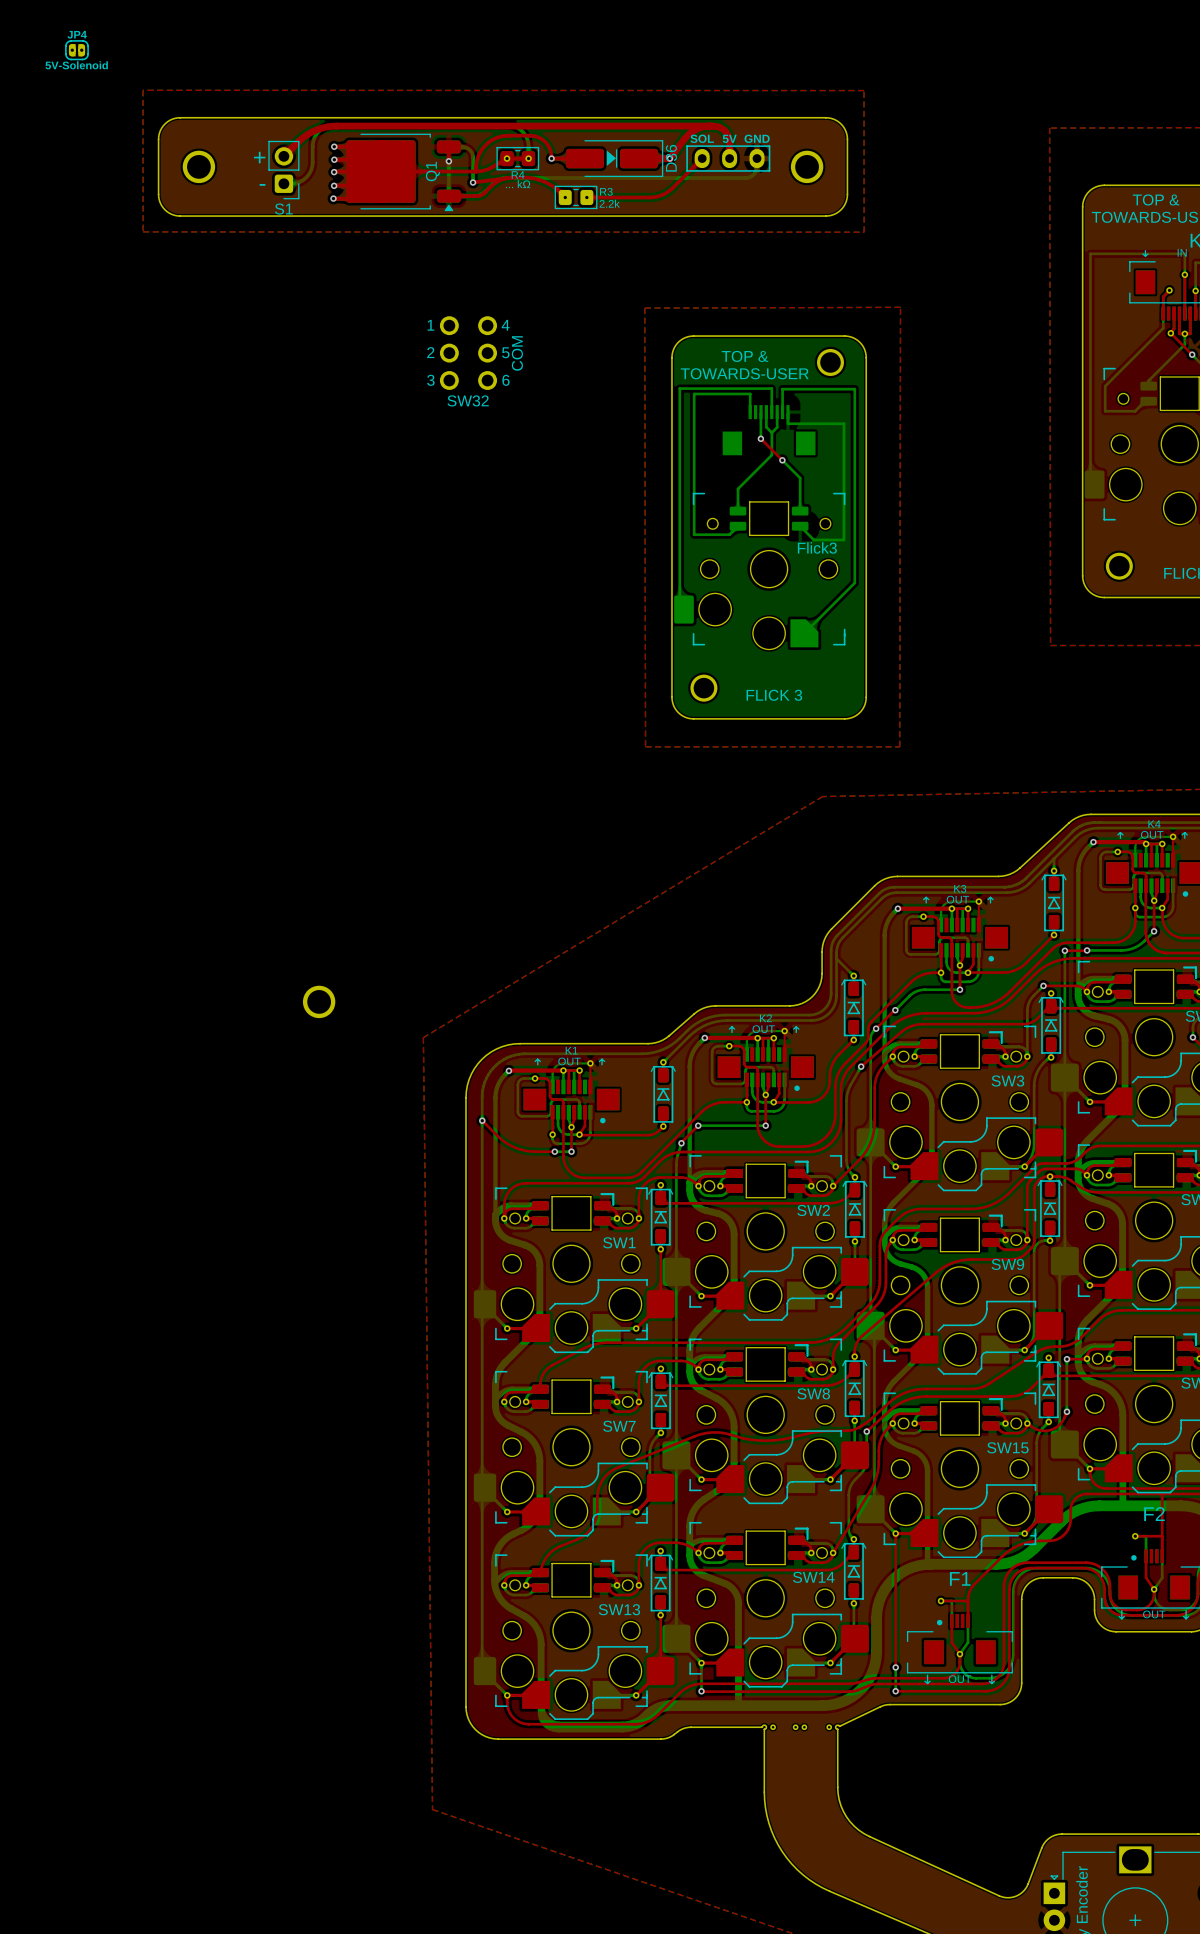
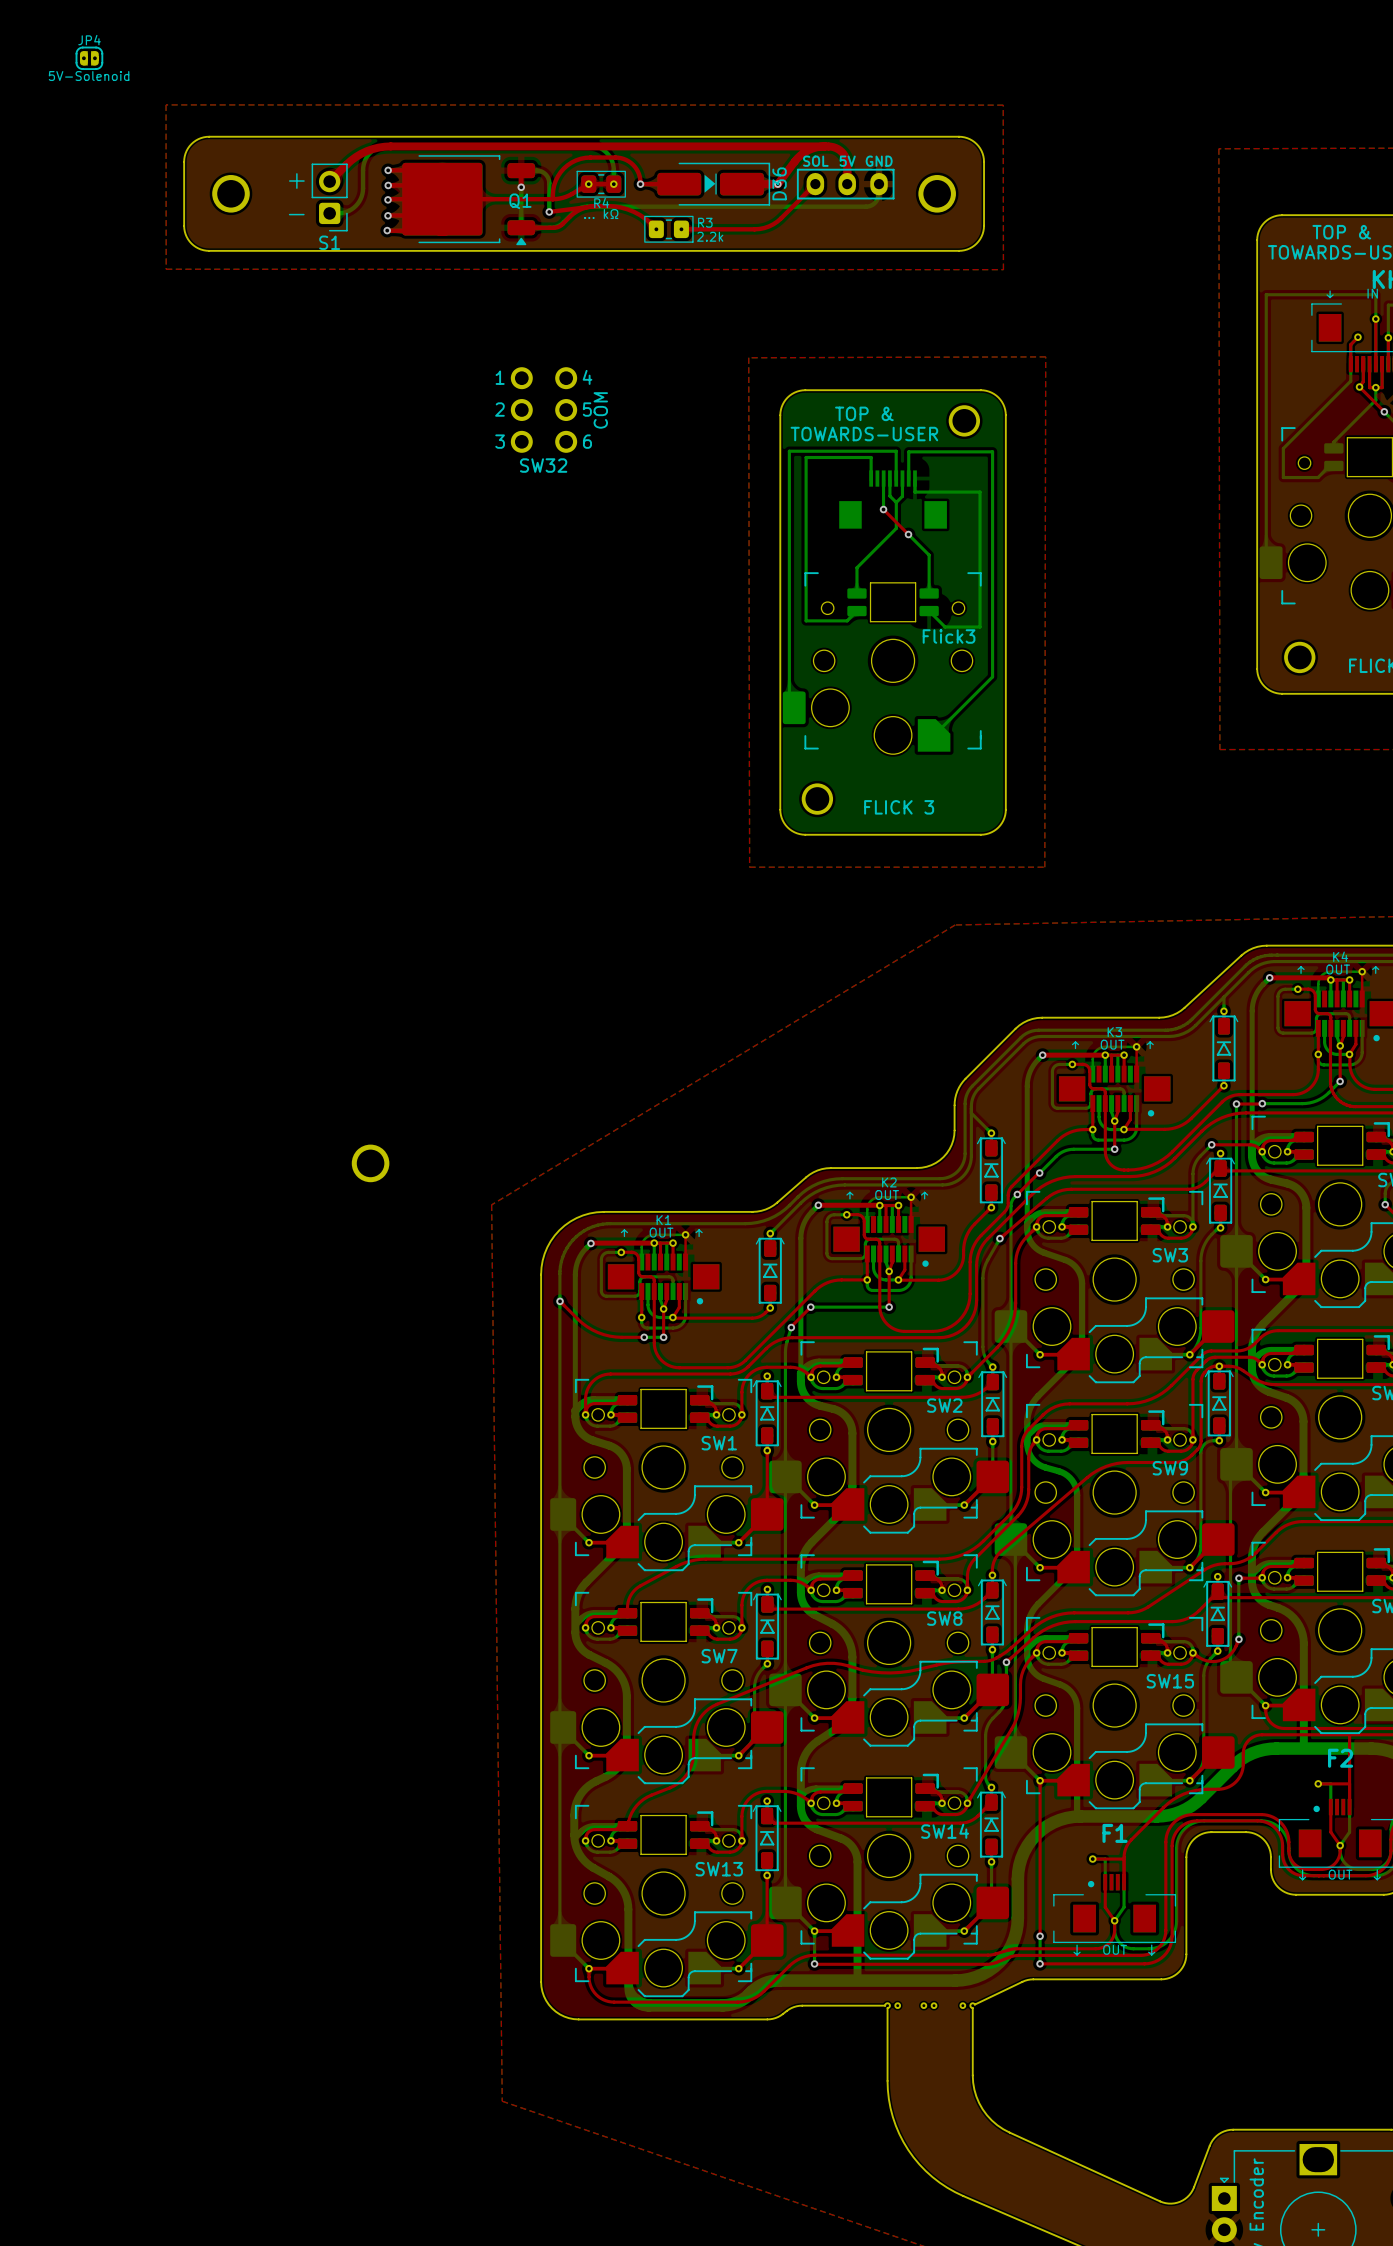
Q1 name rotation: 0° (432, 171) -> 90° clockwise (520, 201)

